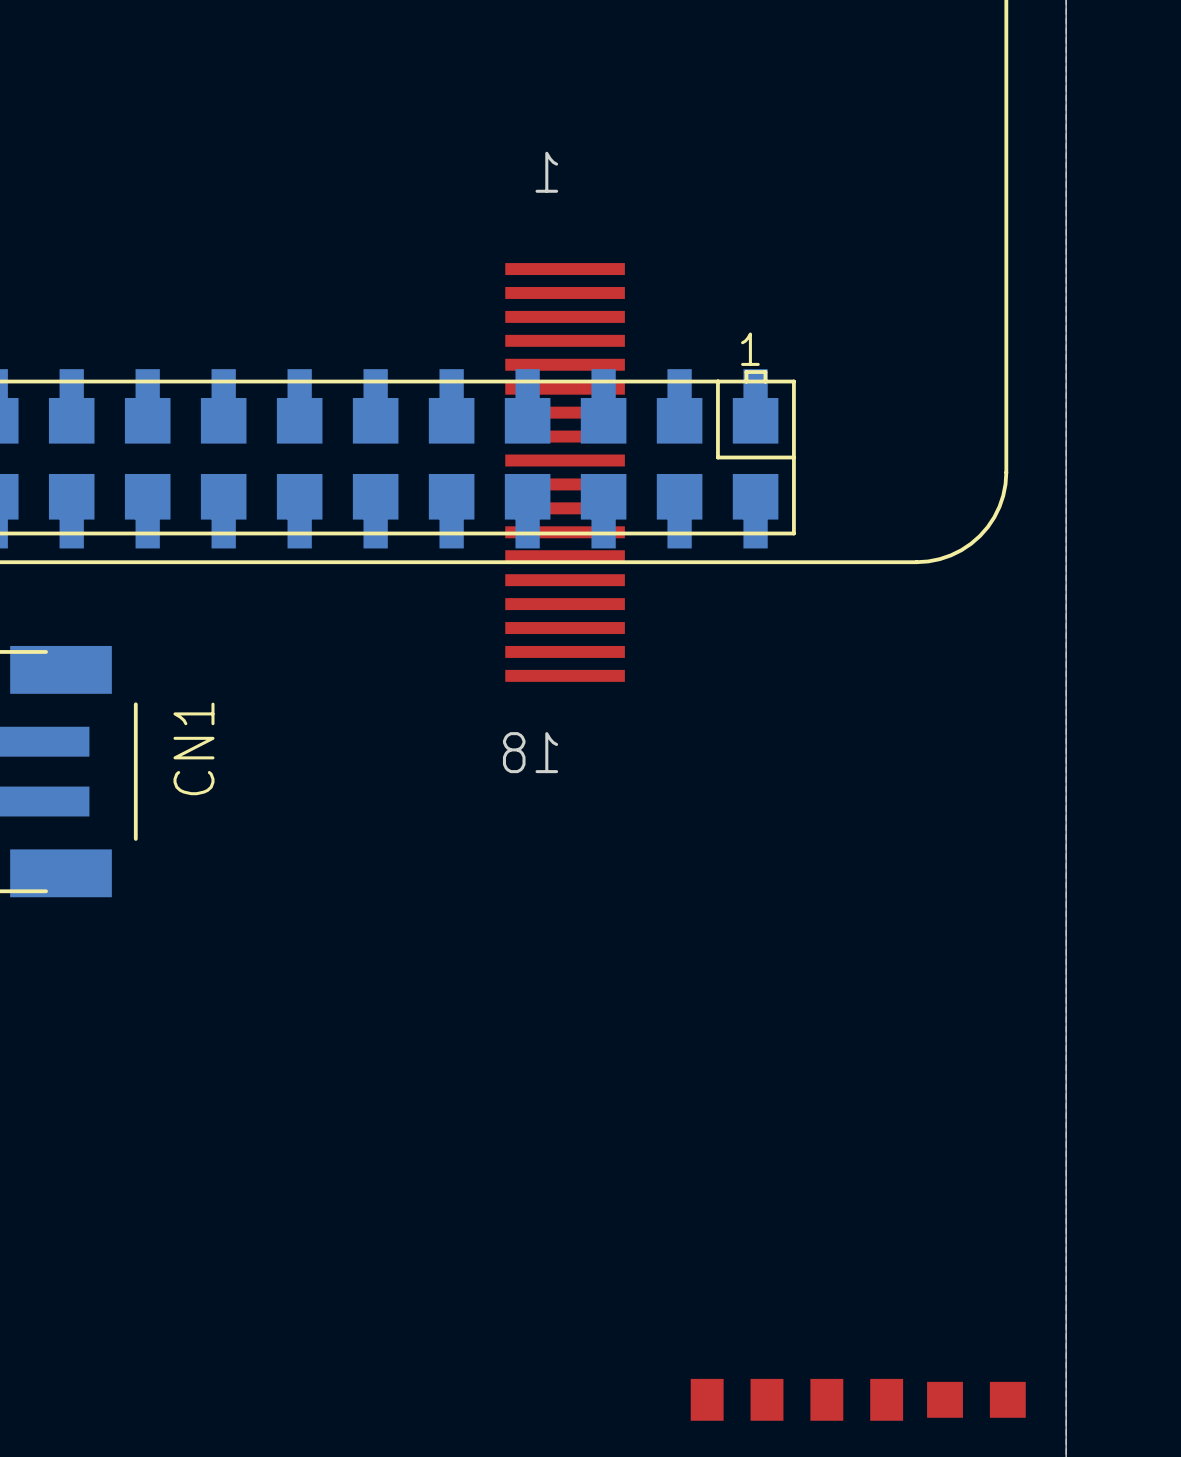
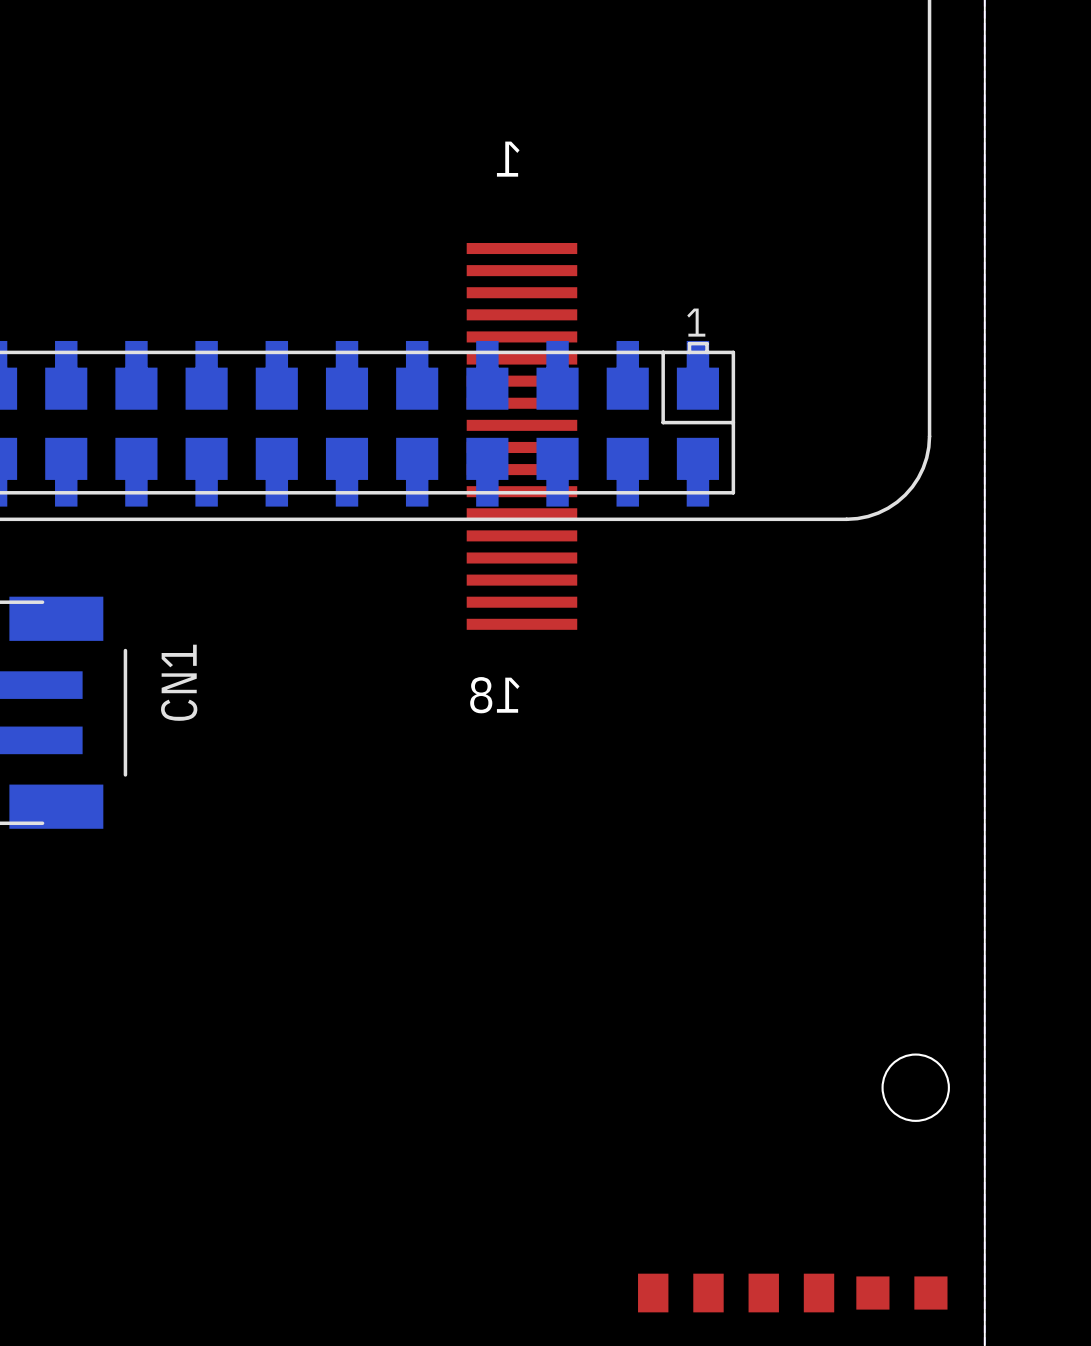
round board edge: none -> [881, 1053, 950, 1122]

